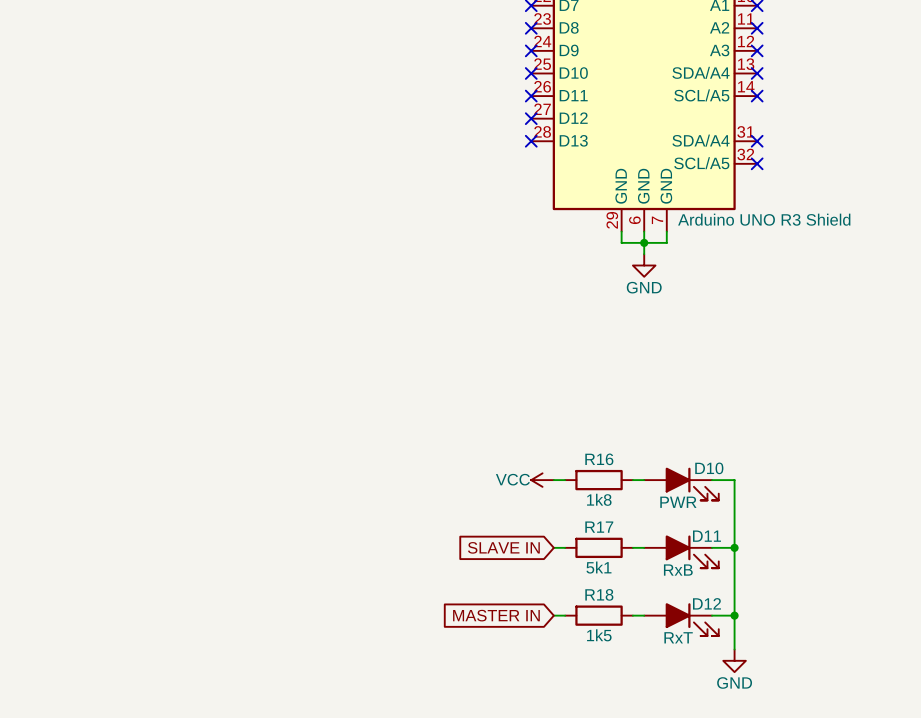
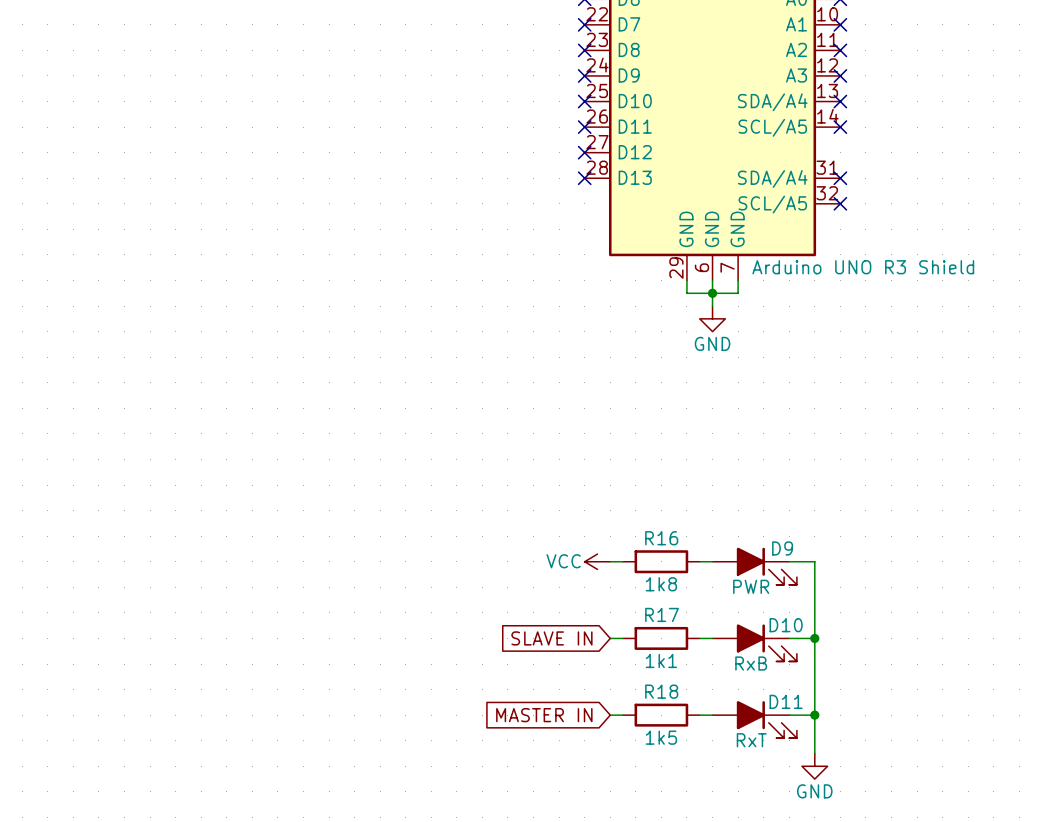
D10 name: D10 (709, 468) -> D9 (782, 548)
D11 name: D11 (706, 536) -> D10 (786, 625)
R17 value: 5k1 (598, 567) -> 1k1 (661, 660)
D12 name: D12 (706, 603) -> D11 (786, 701)

